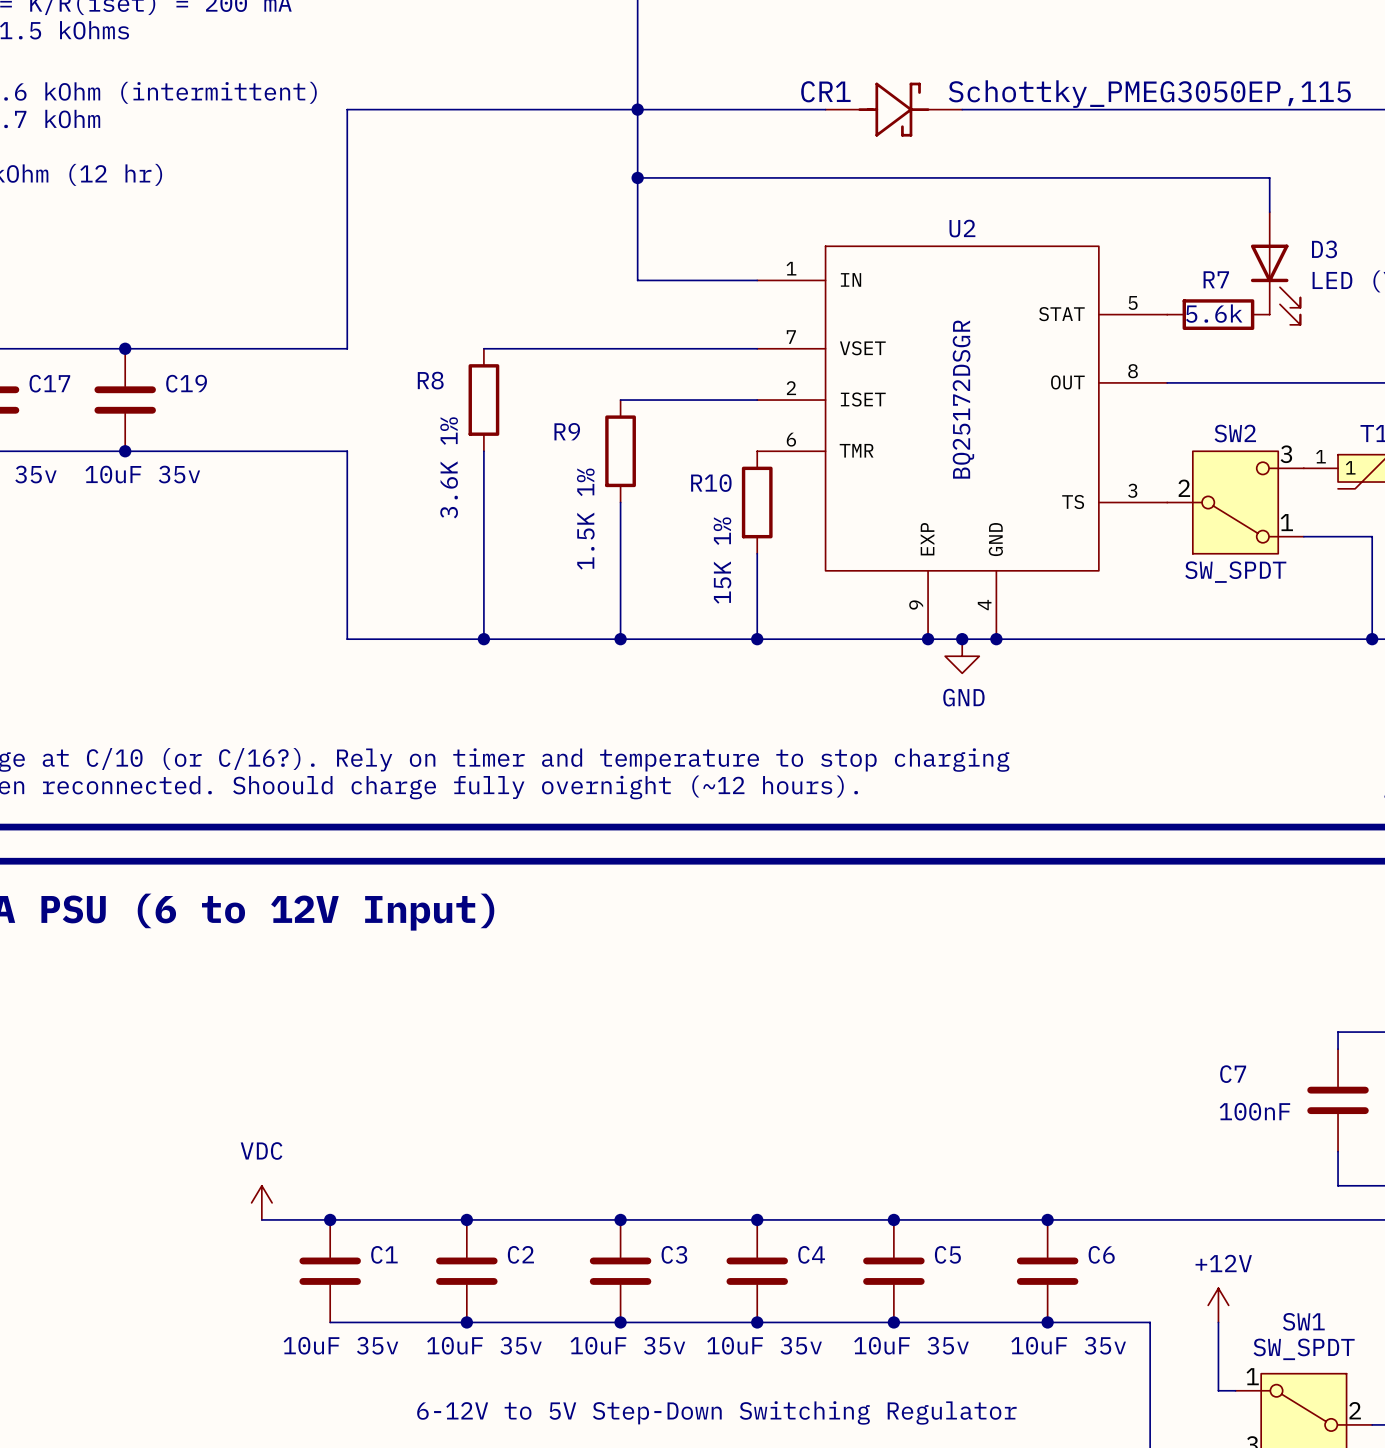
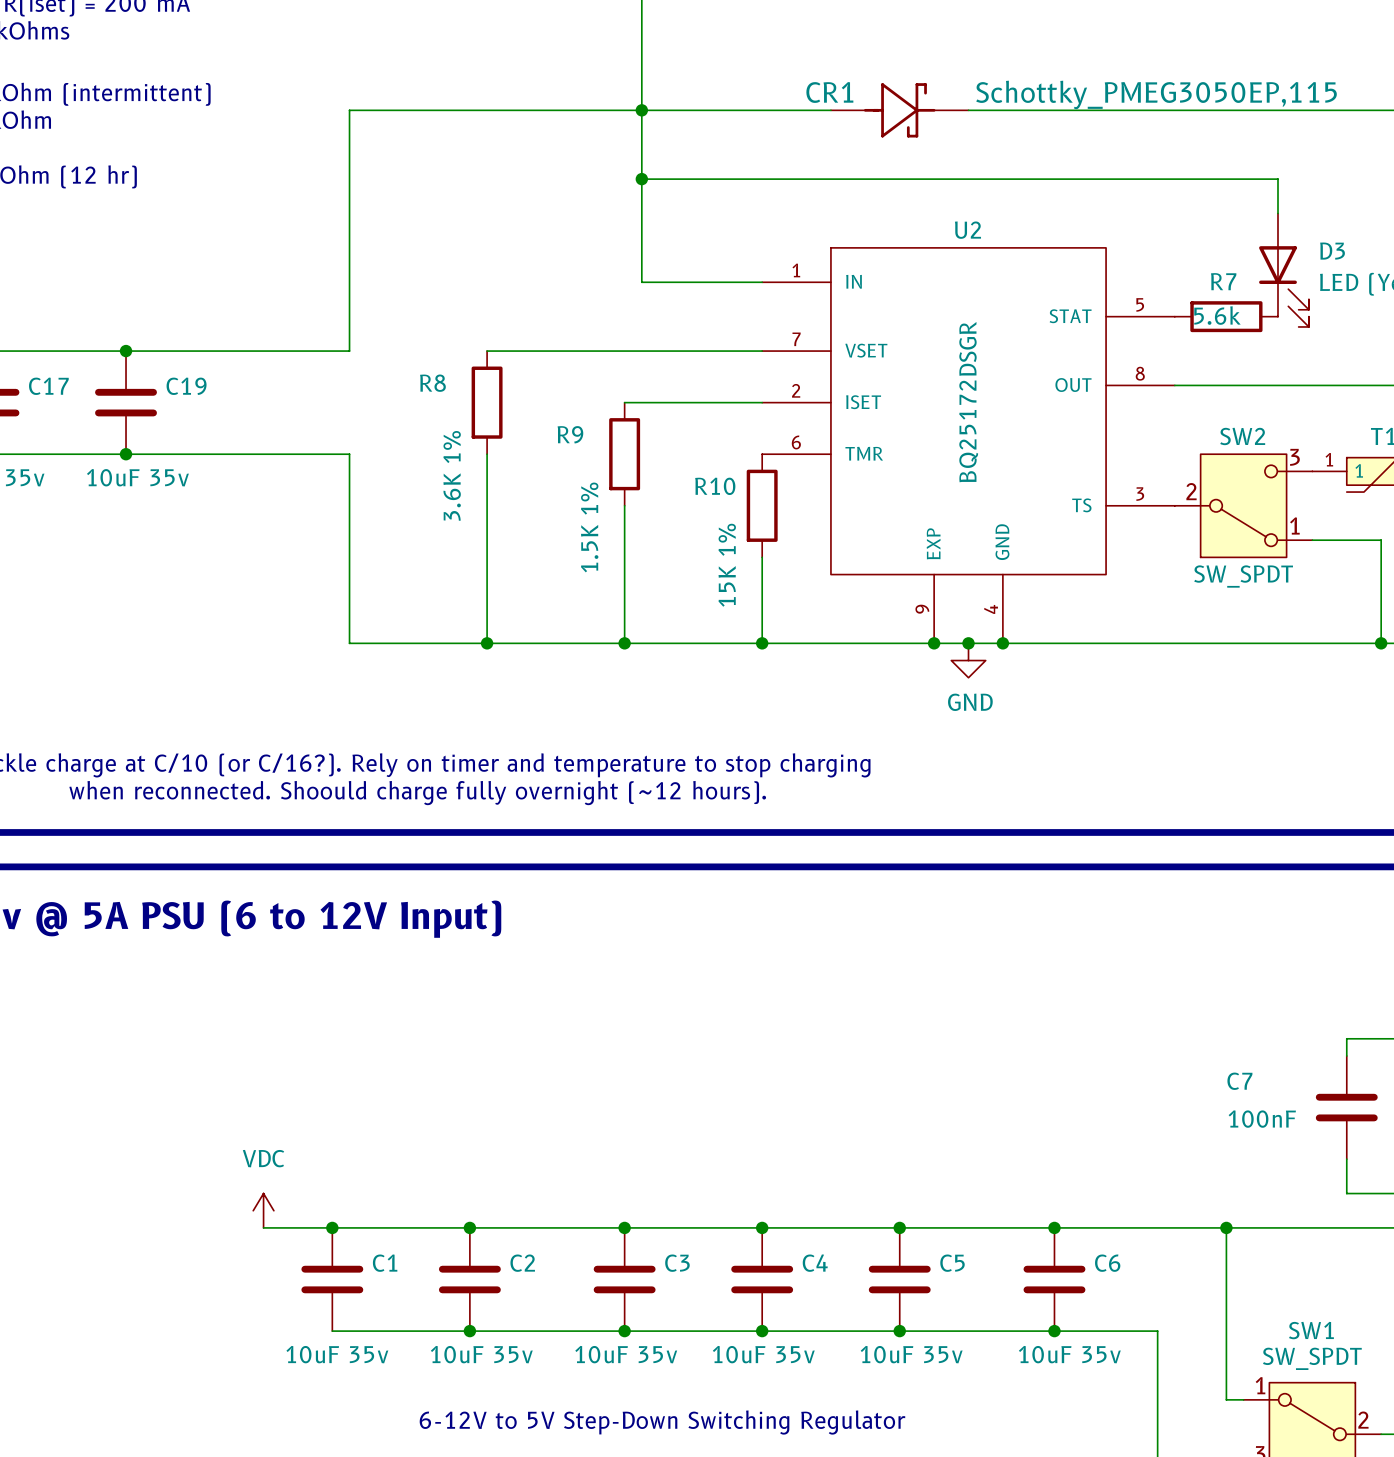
wire: none -> (1226, 1227) (1226, 1331)
junction: none -> (1226, 1227)
power symbol: +12V (1218, 1305) -> none

